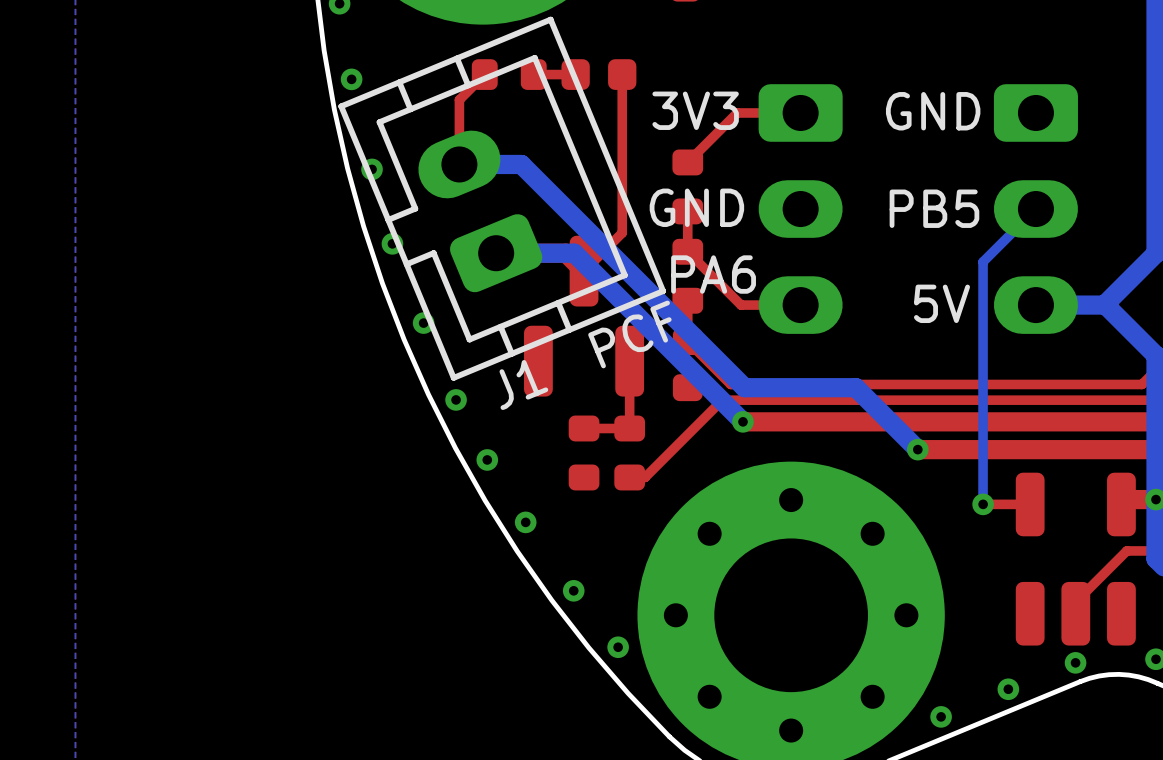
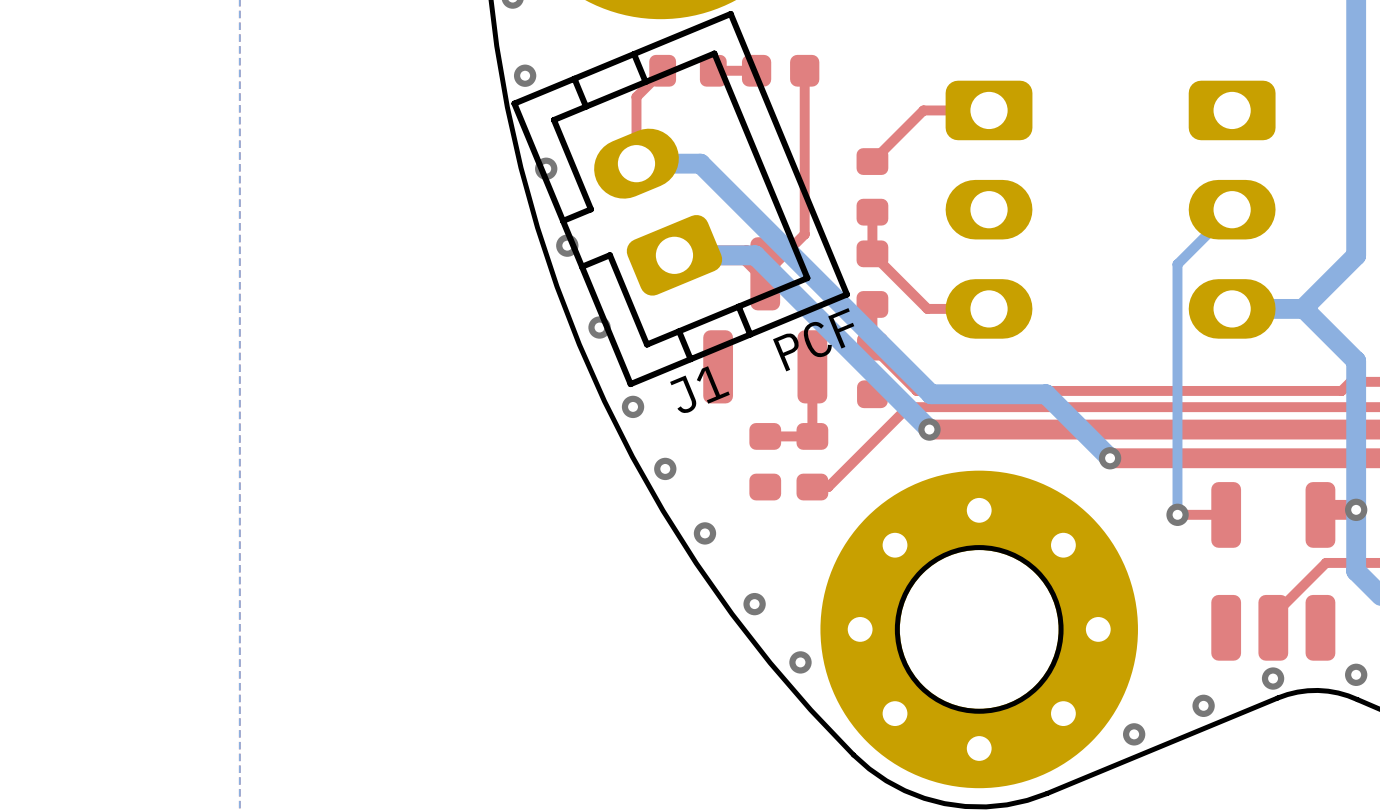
text: 3V3 (695, 110) -> none
text: GND (933, 111) -> none
text: GND (696, 207) -> none
text: PB5 (934, 208) -> none
text: PA6 (713, 274) -> none
text: 5V (941, 303) -> none
drawing: none -> [894, 545, 1064, 714]

